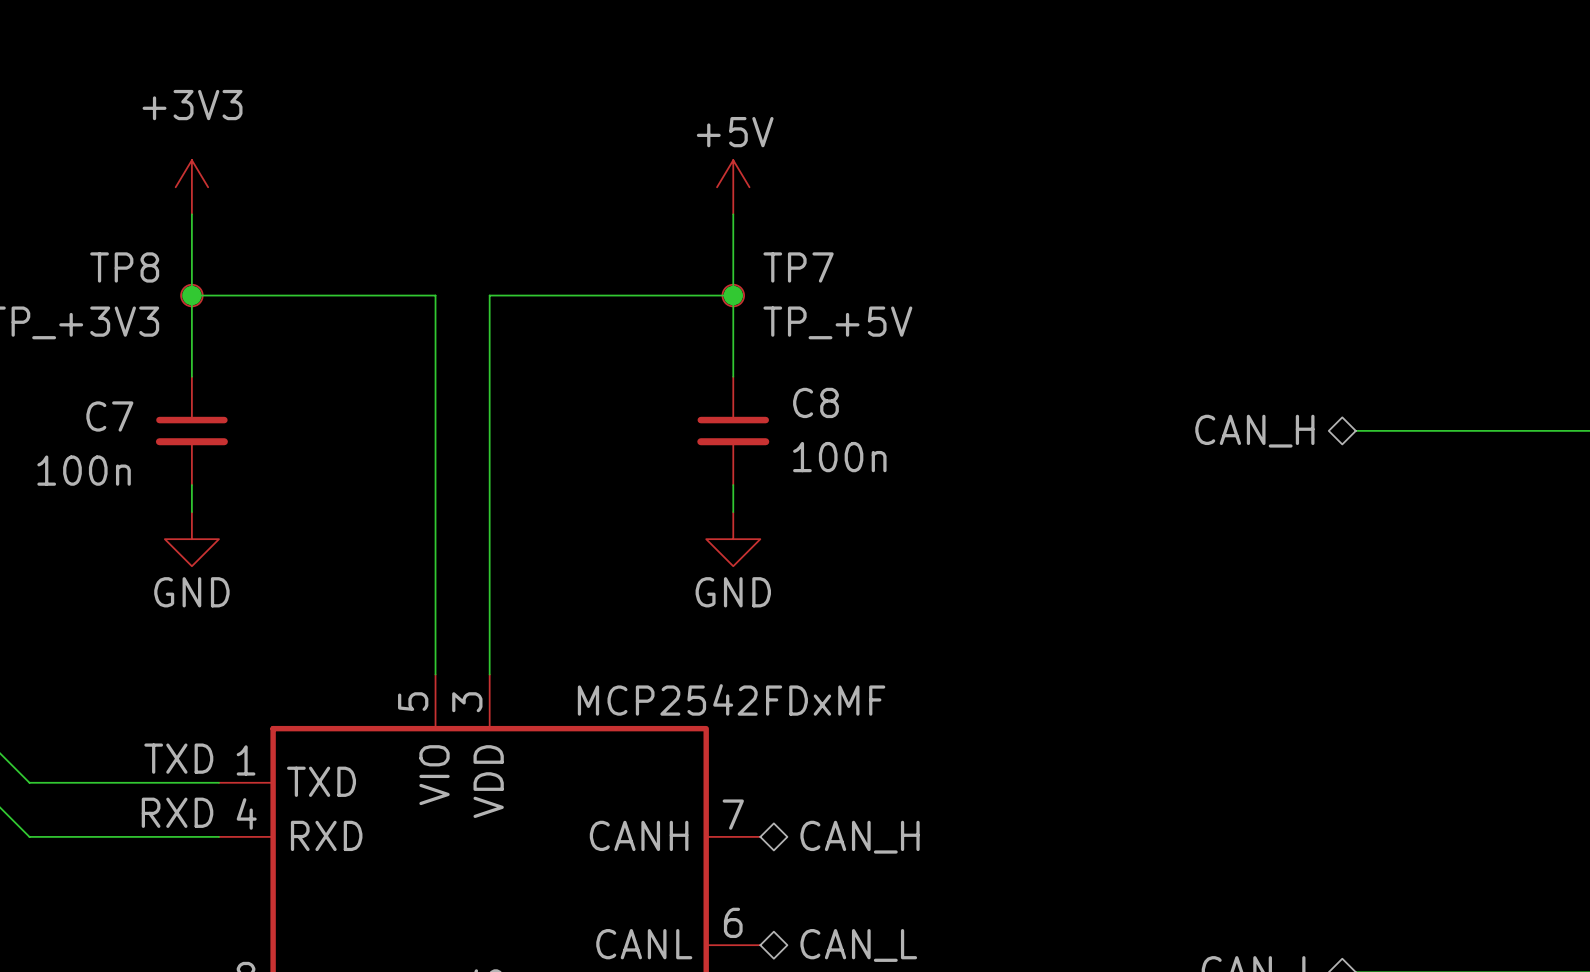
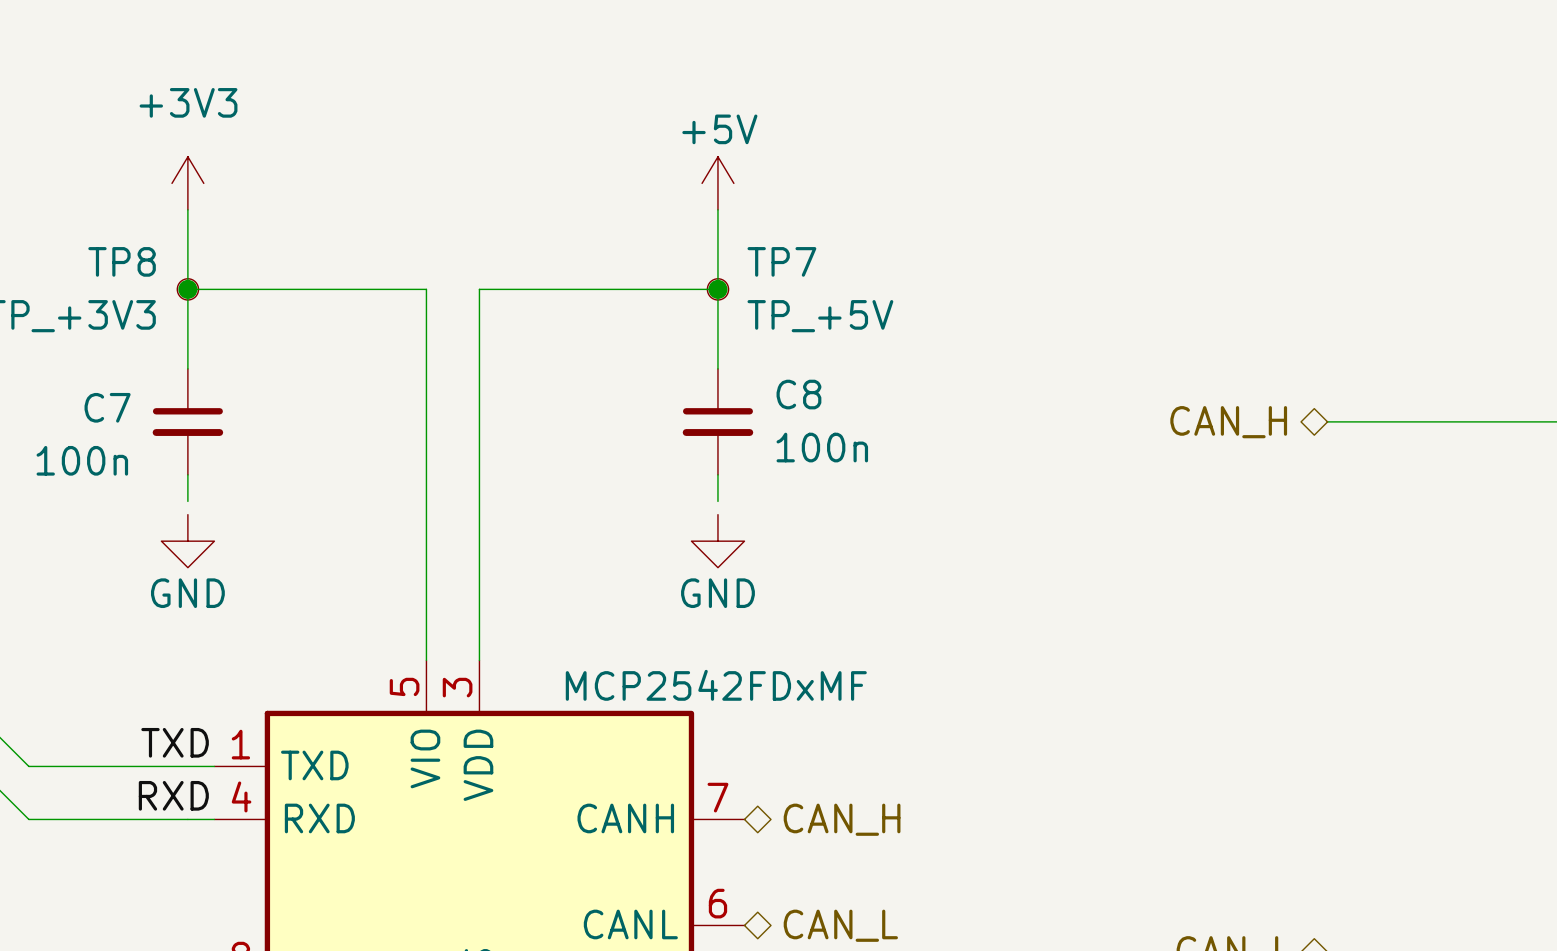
power symbol position: GND (191, 539) -> GND (187, 541)
power symbol position: GND (733, 539) -> GND (717, 541)

